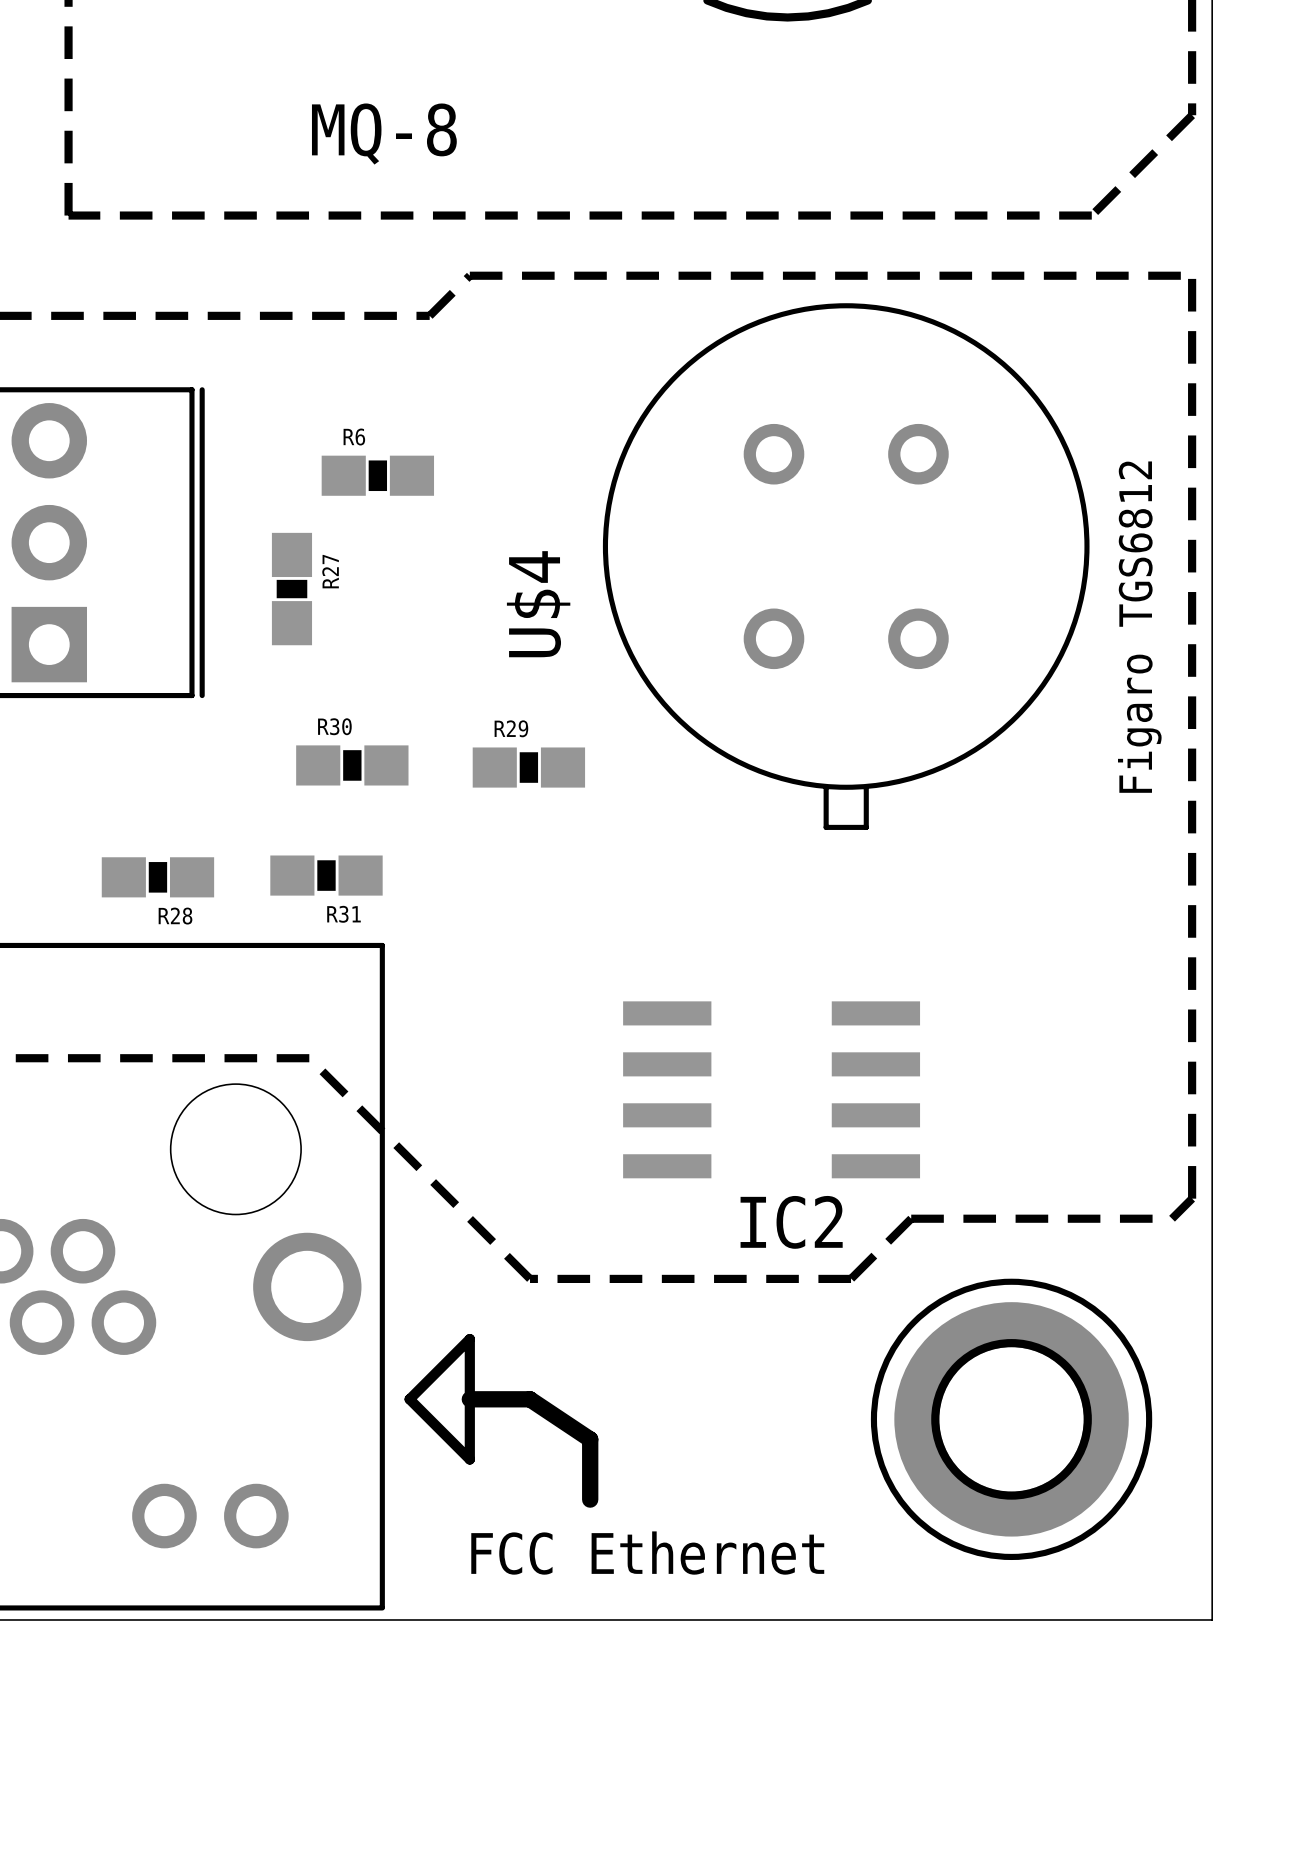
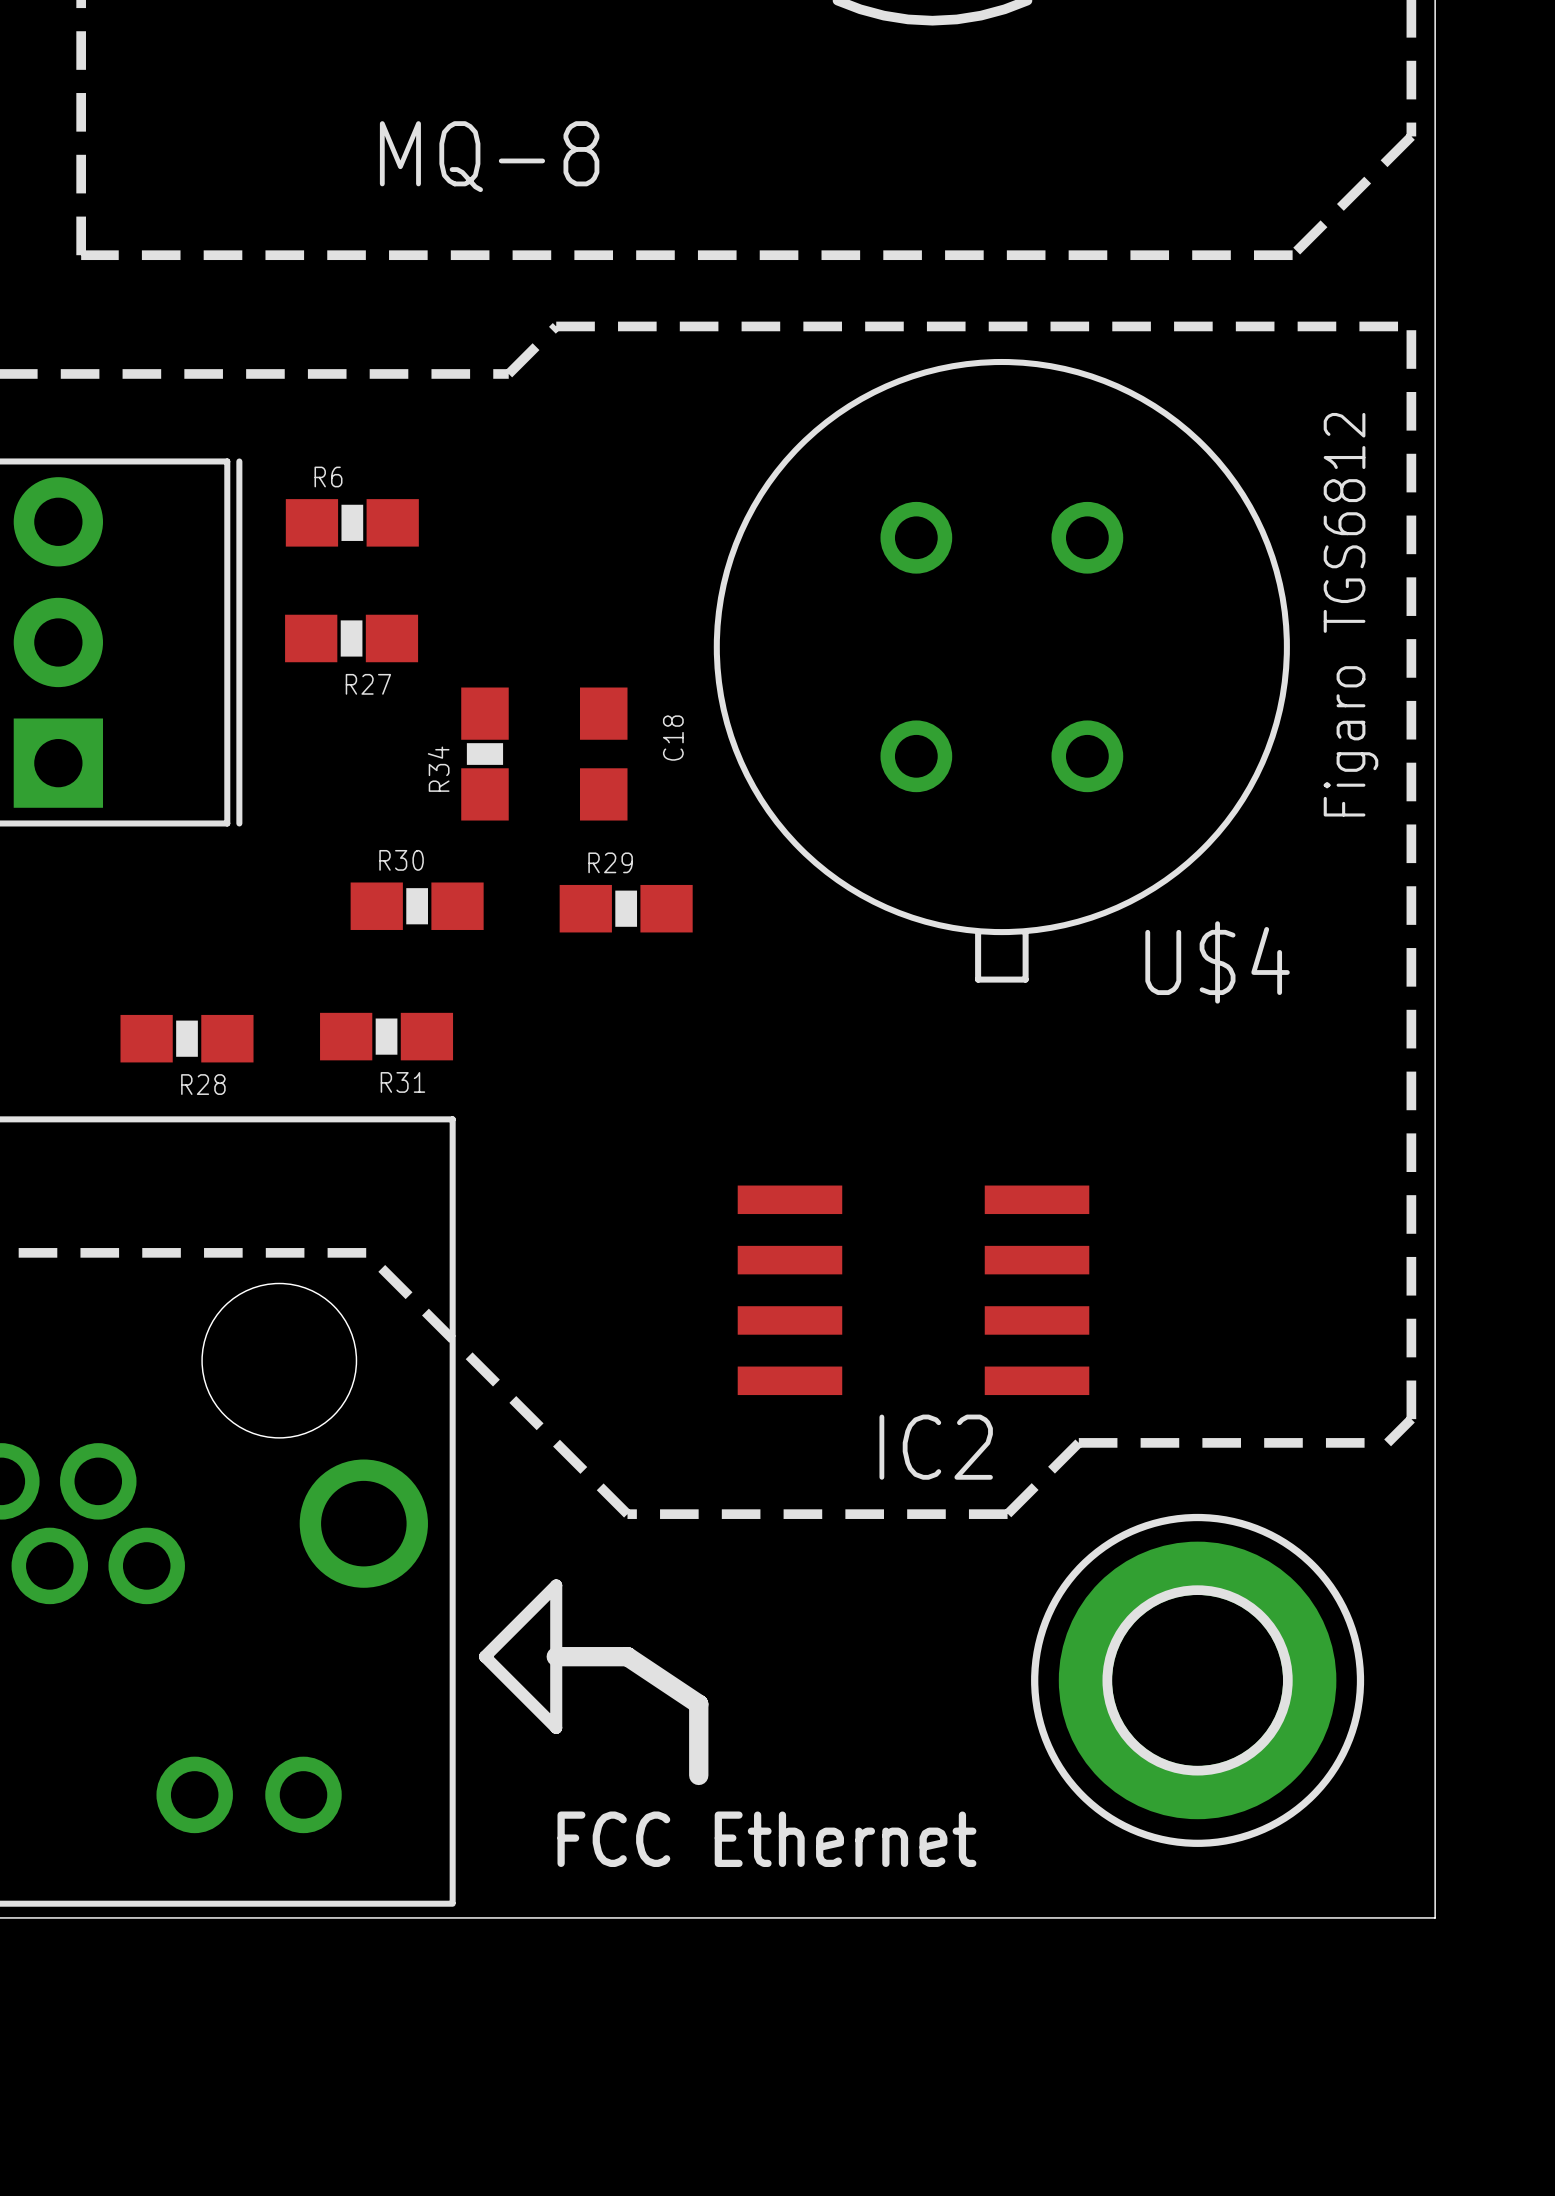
R6 position: (377, 475) -> (352, 522)
R27 rotation: 0° (291, 589) -> 90° clockwise (351, 638)
U$4 name rotation: 0° (538, 604) -> 90° clockwise (1217, 962)
U$4 name position: U$4 (538, 604) -> U$4 (1217, 962)
text position: Figaro TGS6812 (1139, 627) -> Figaro TGS6812 (1350, 614)
R34: none -> (484, 754)
C18: none -> (603, 754)

